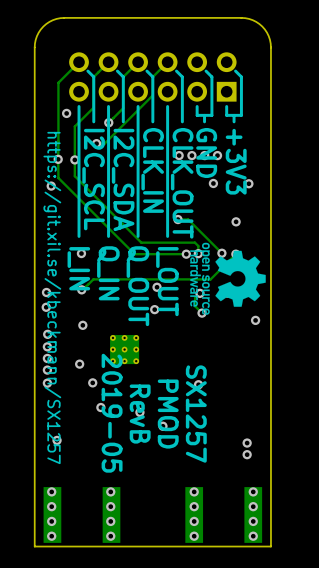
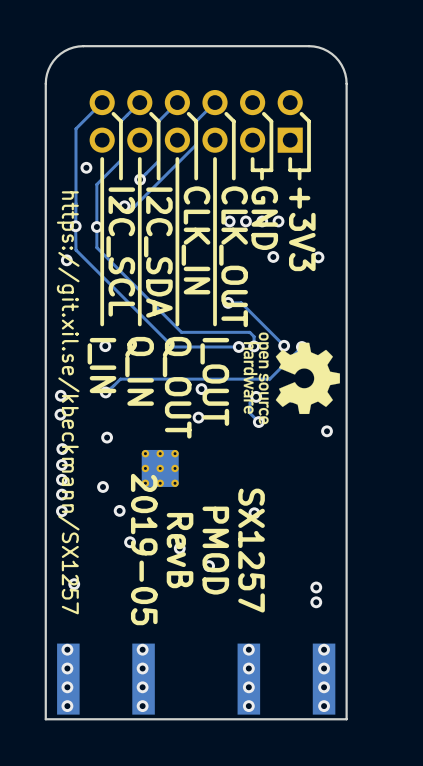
via: (236, 221) -> none

